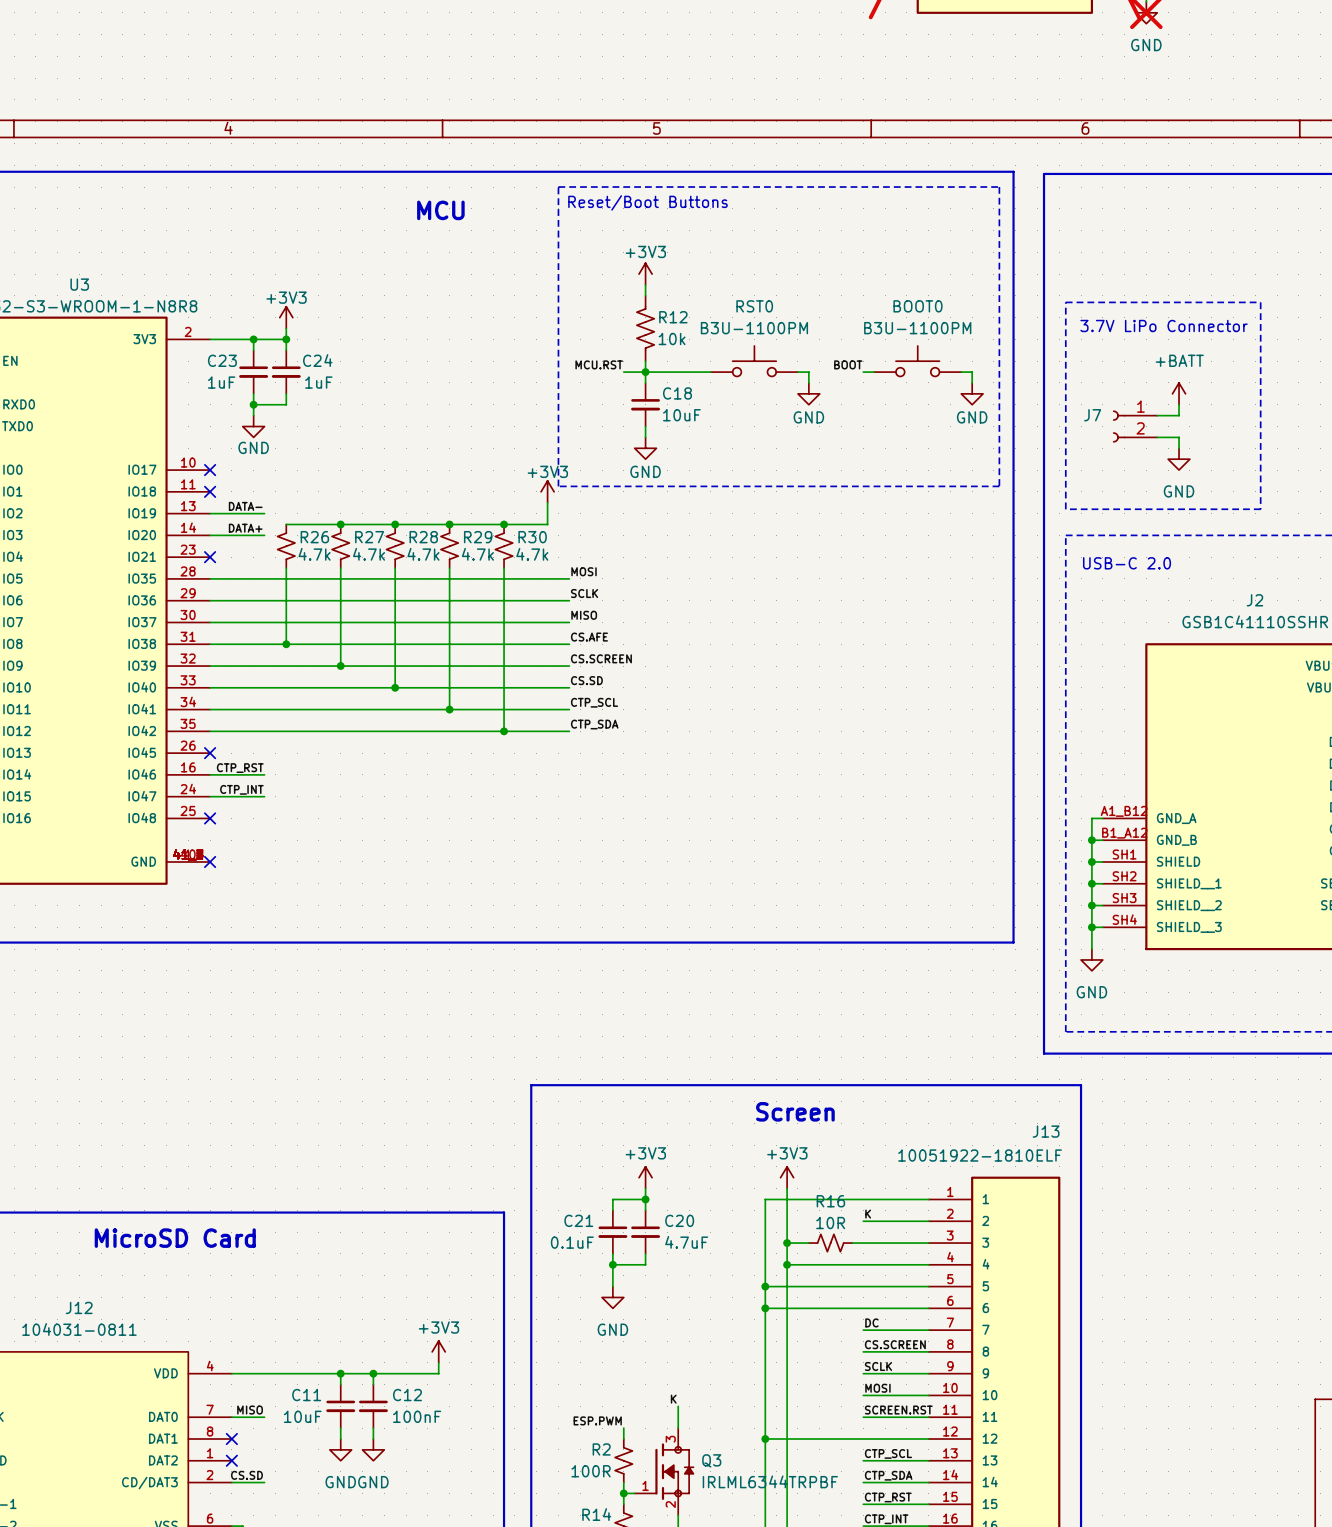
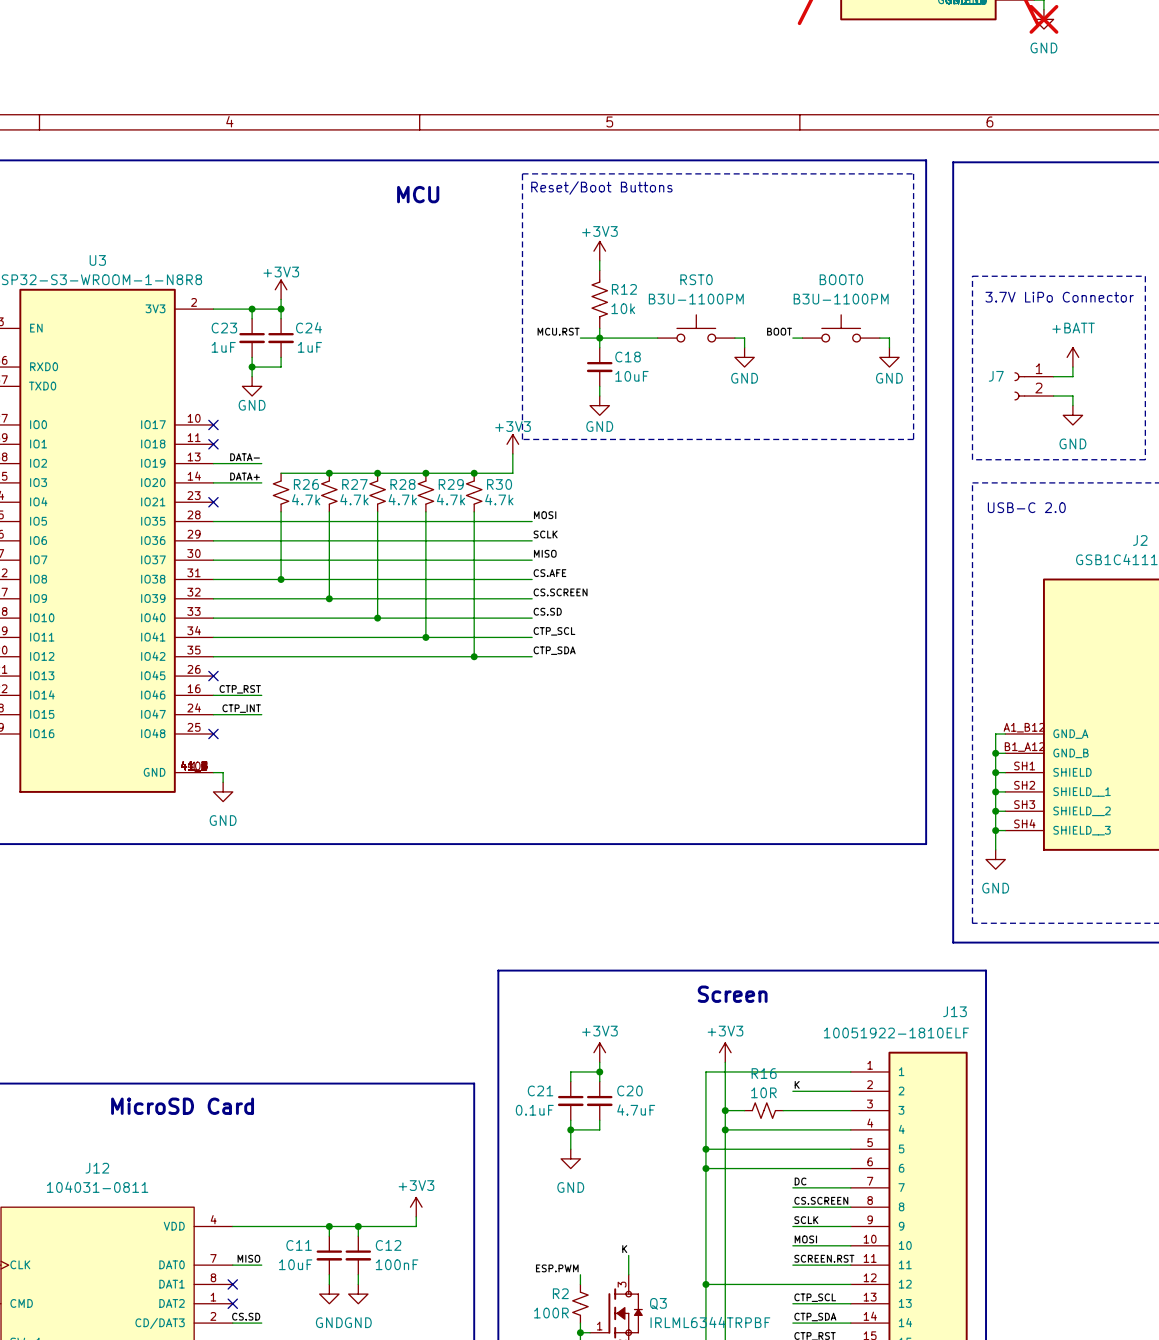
wire: none -> (213, 772) (223, 772) (223, 782)
no-connect mark: (210, 861) -> none
power symbol: none -> GND (223, 791)

